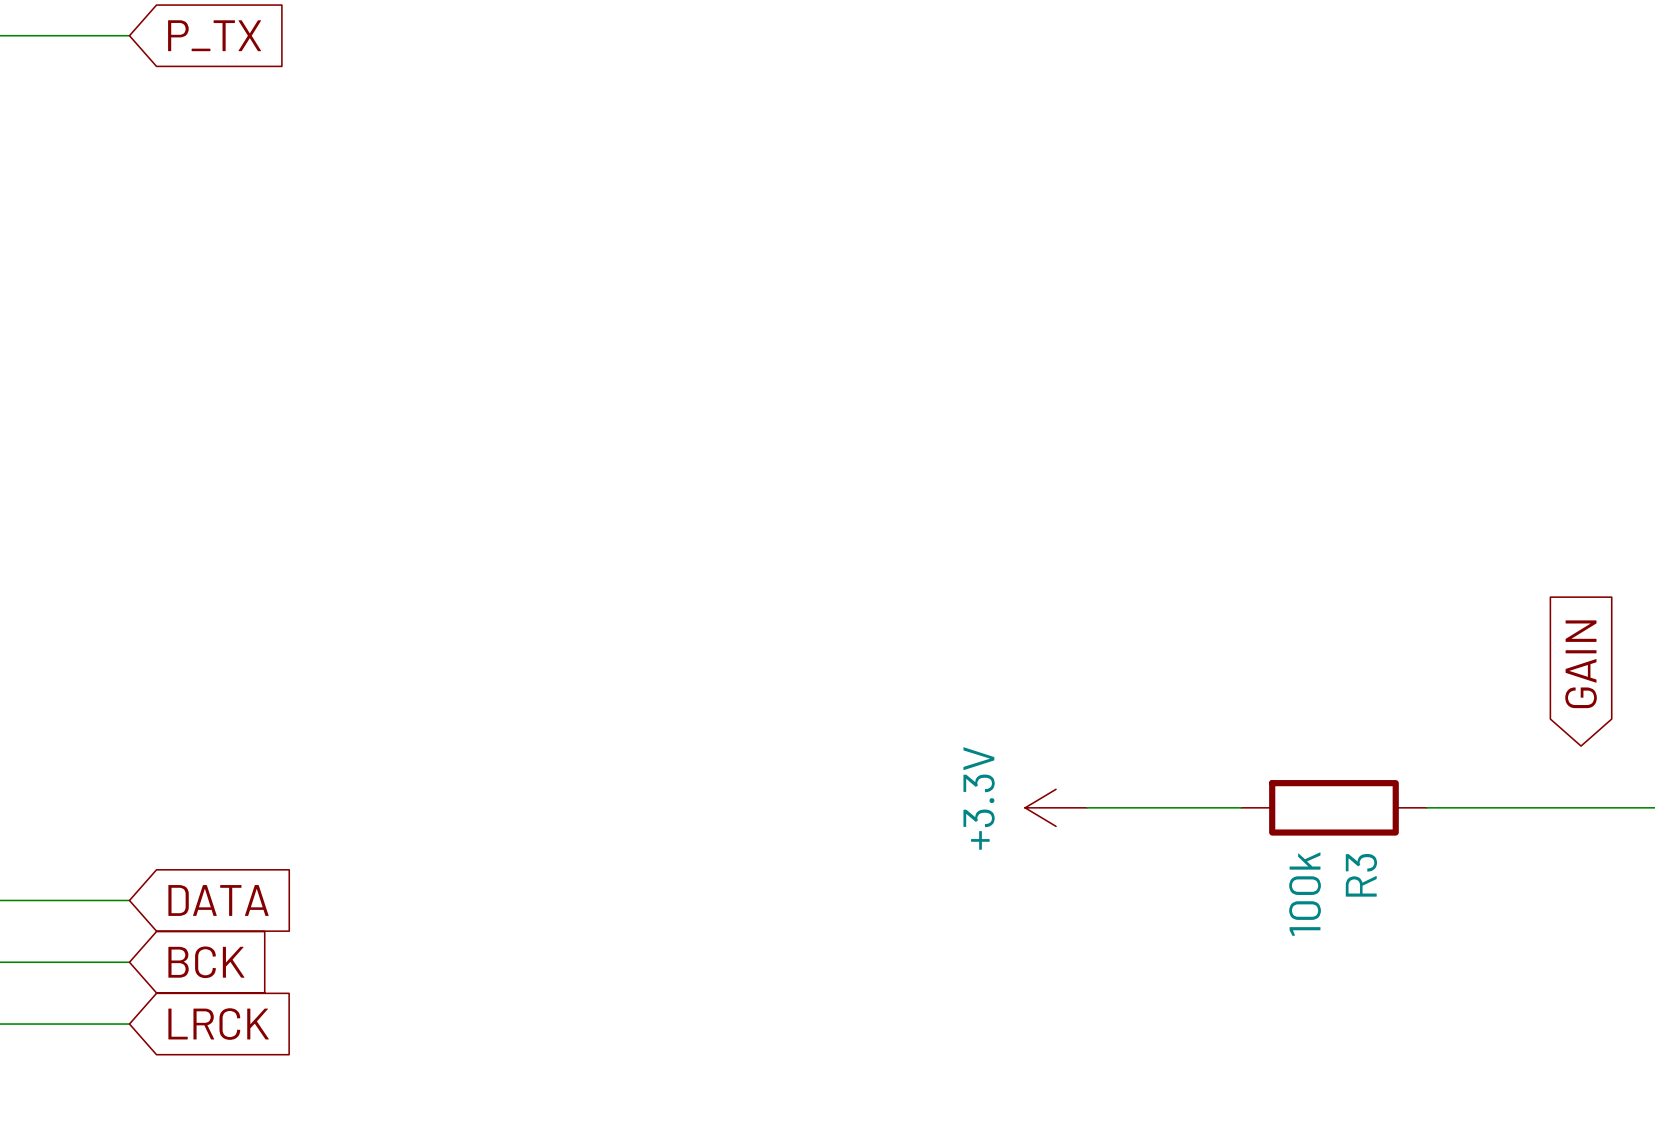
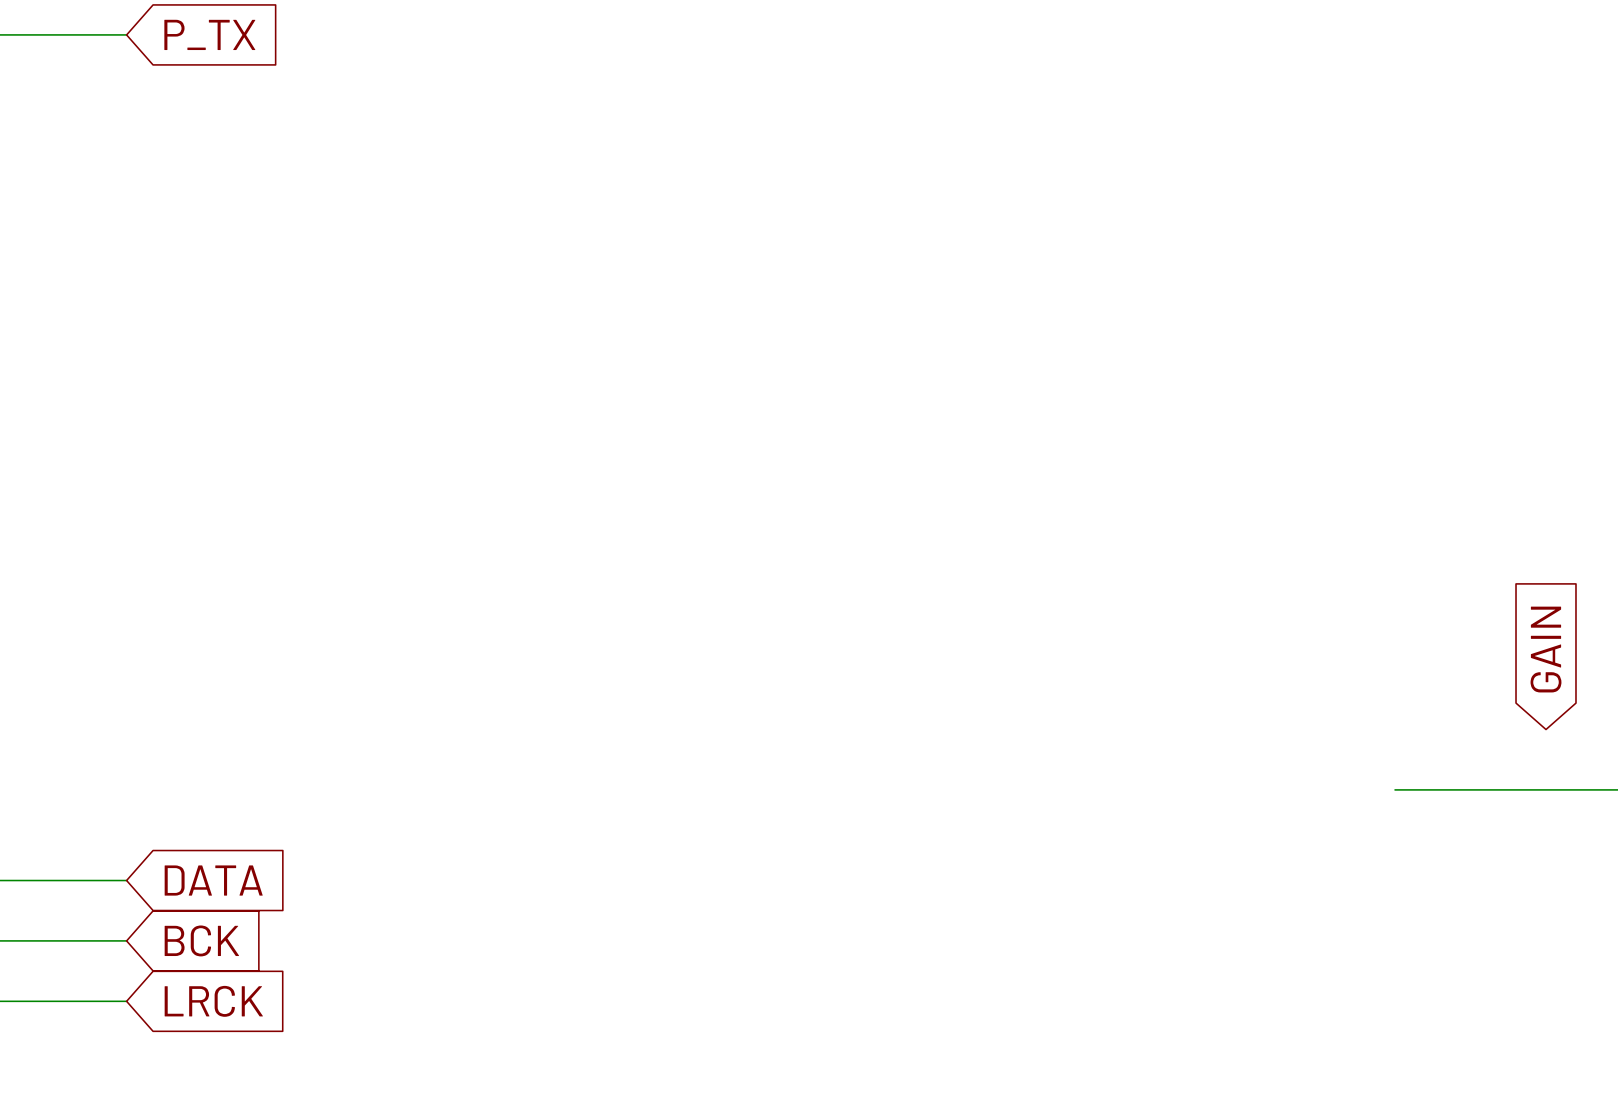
power symbol: +3.3V (1056, 807) -> none
wire: (1086, 807) (1241, 807) -> none
R3: 100k (1333, 807) -> none

